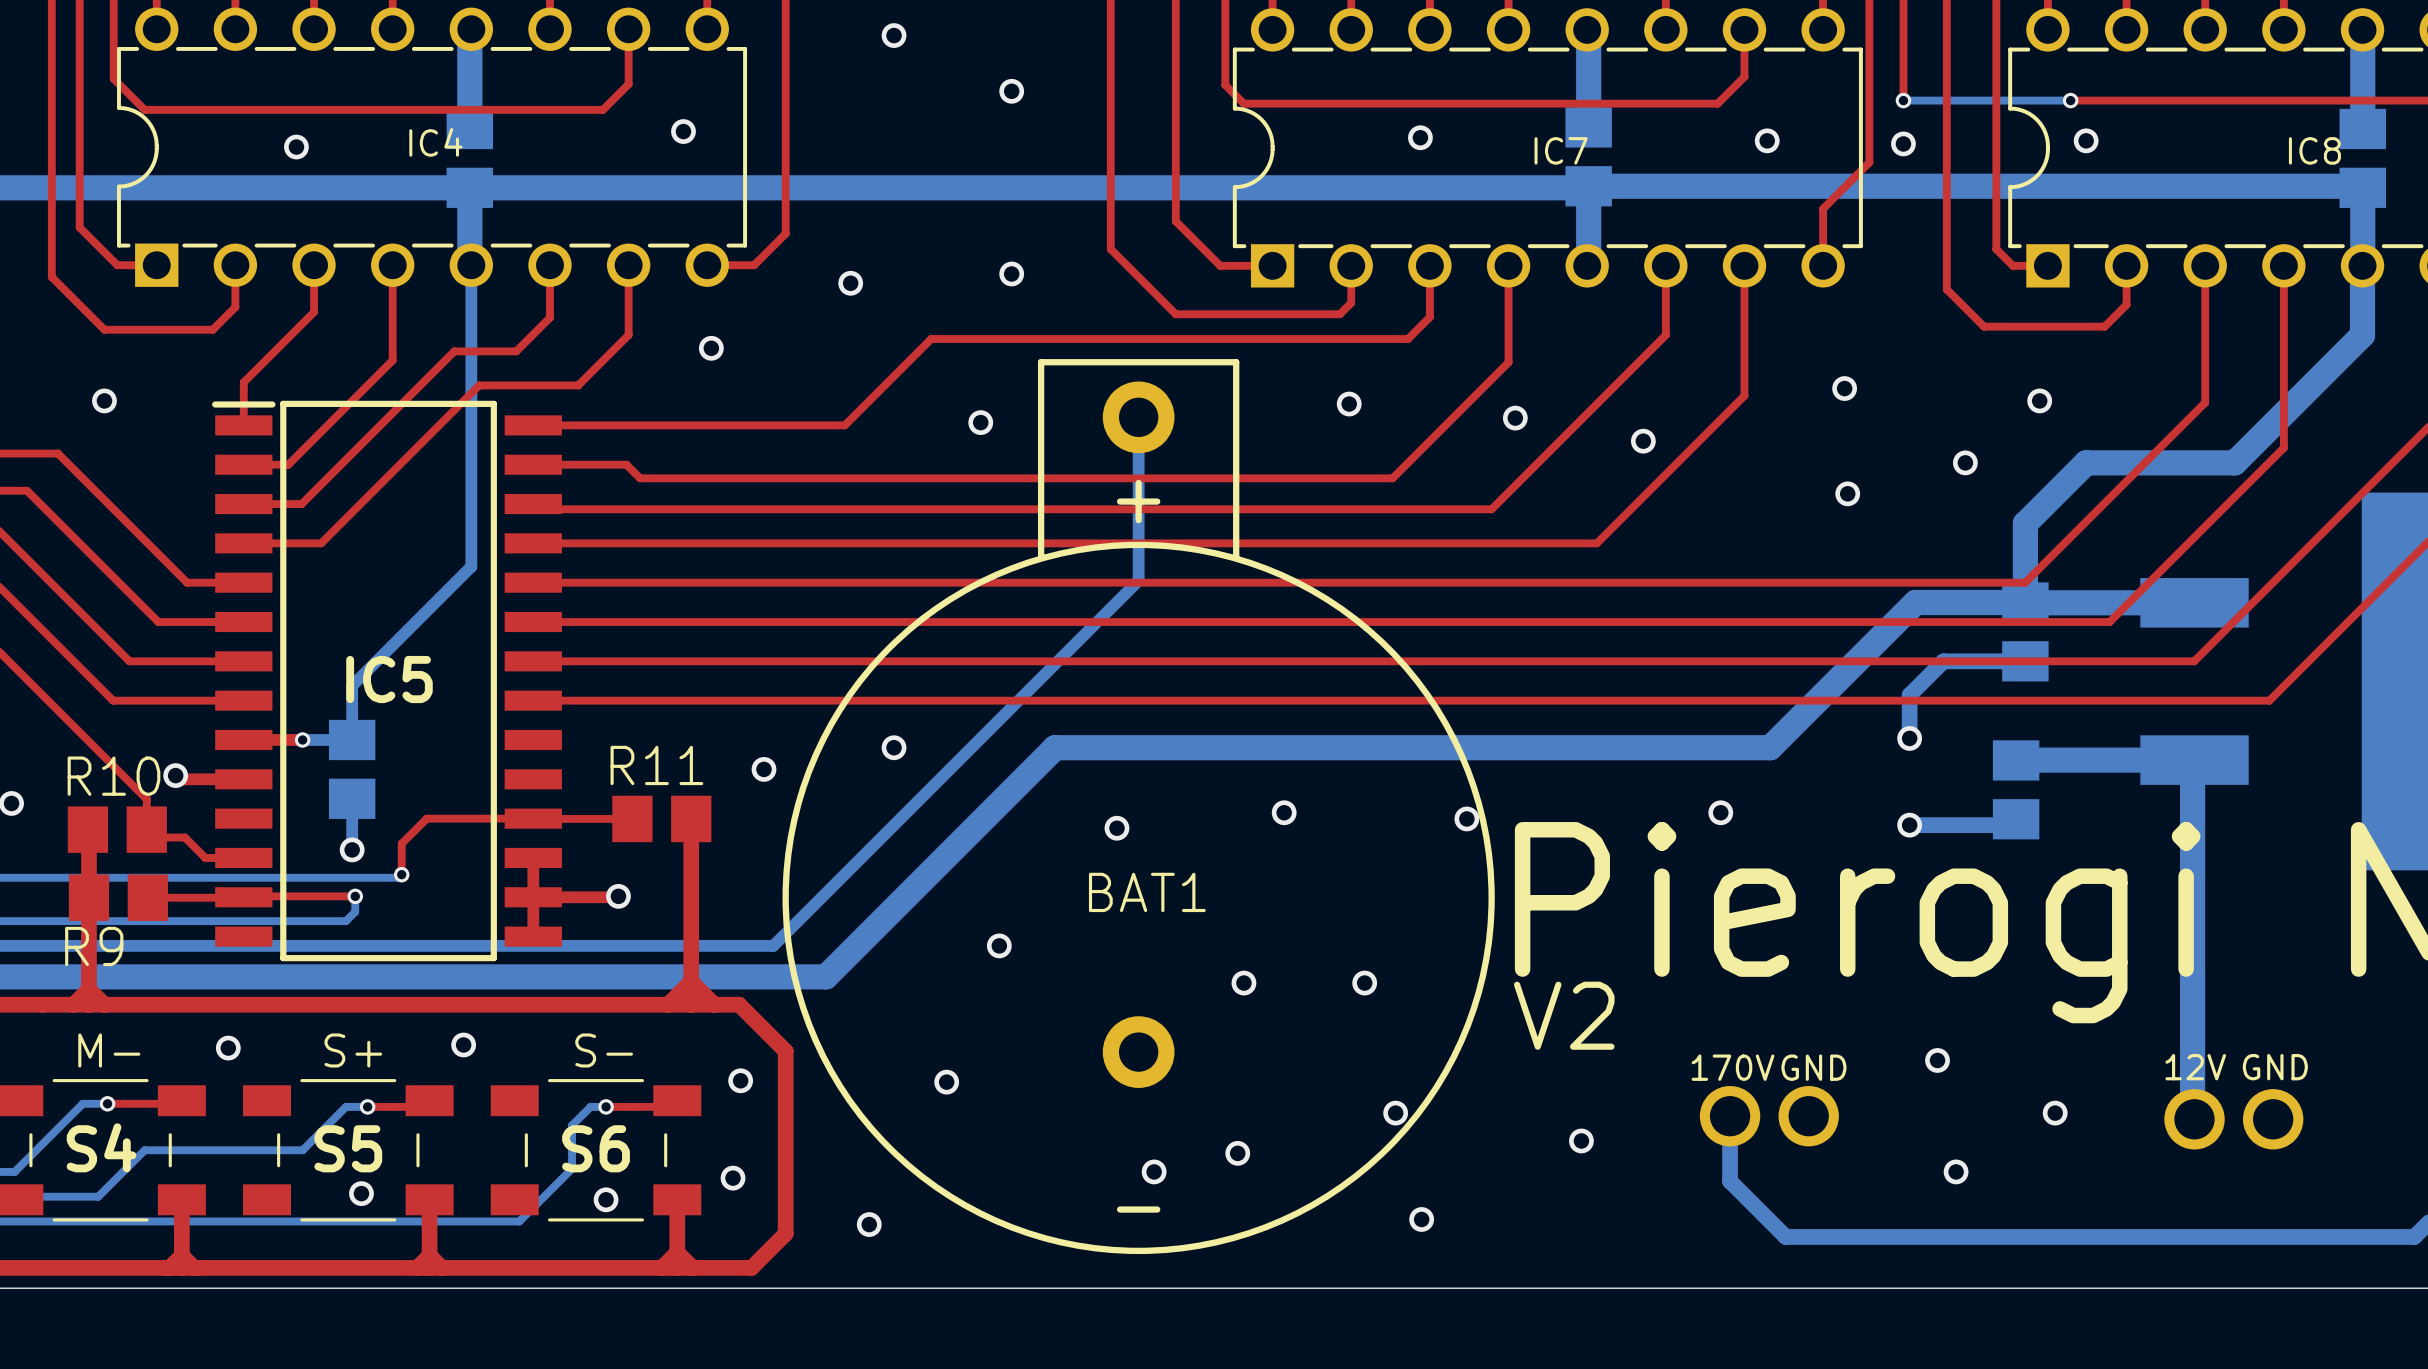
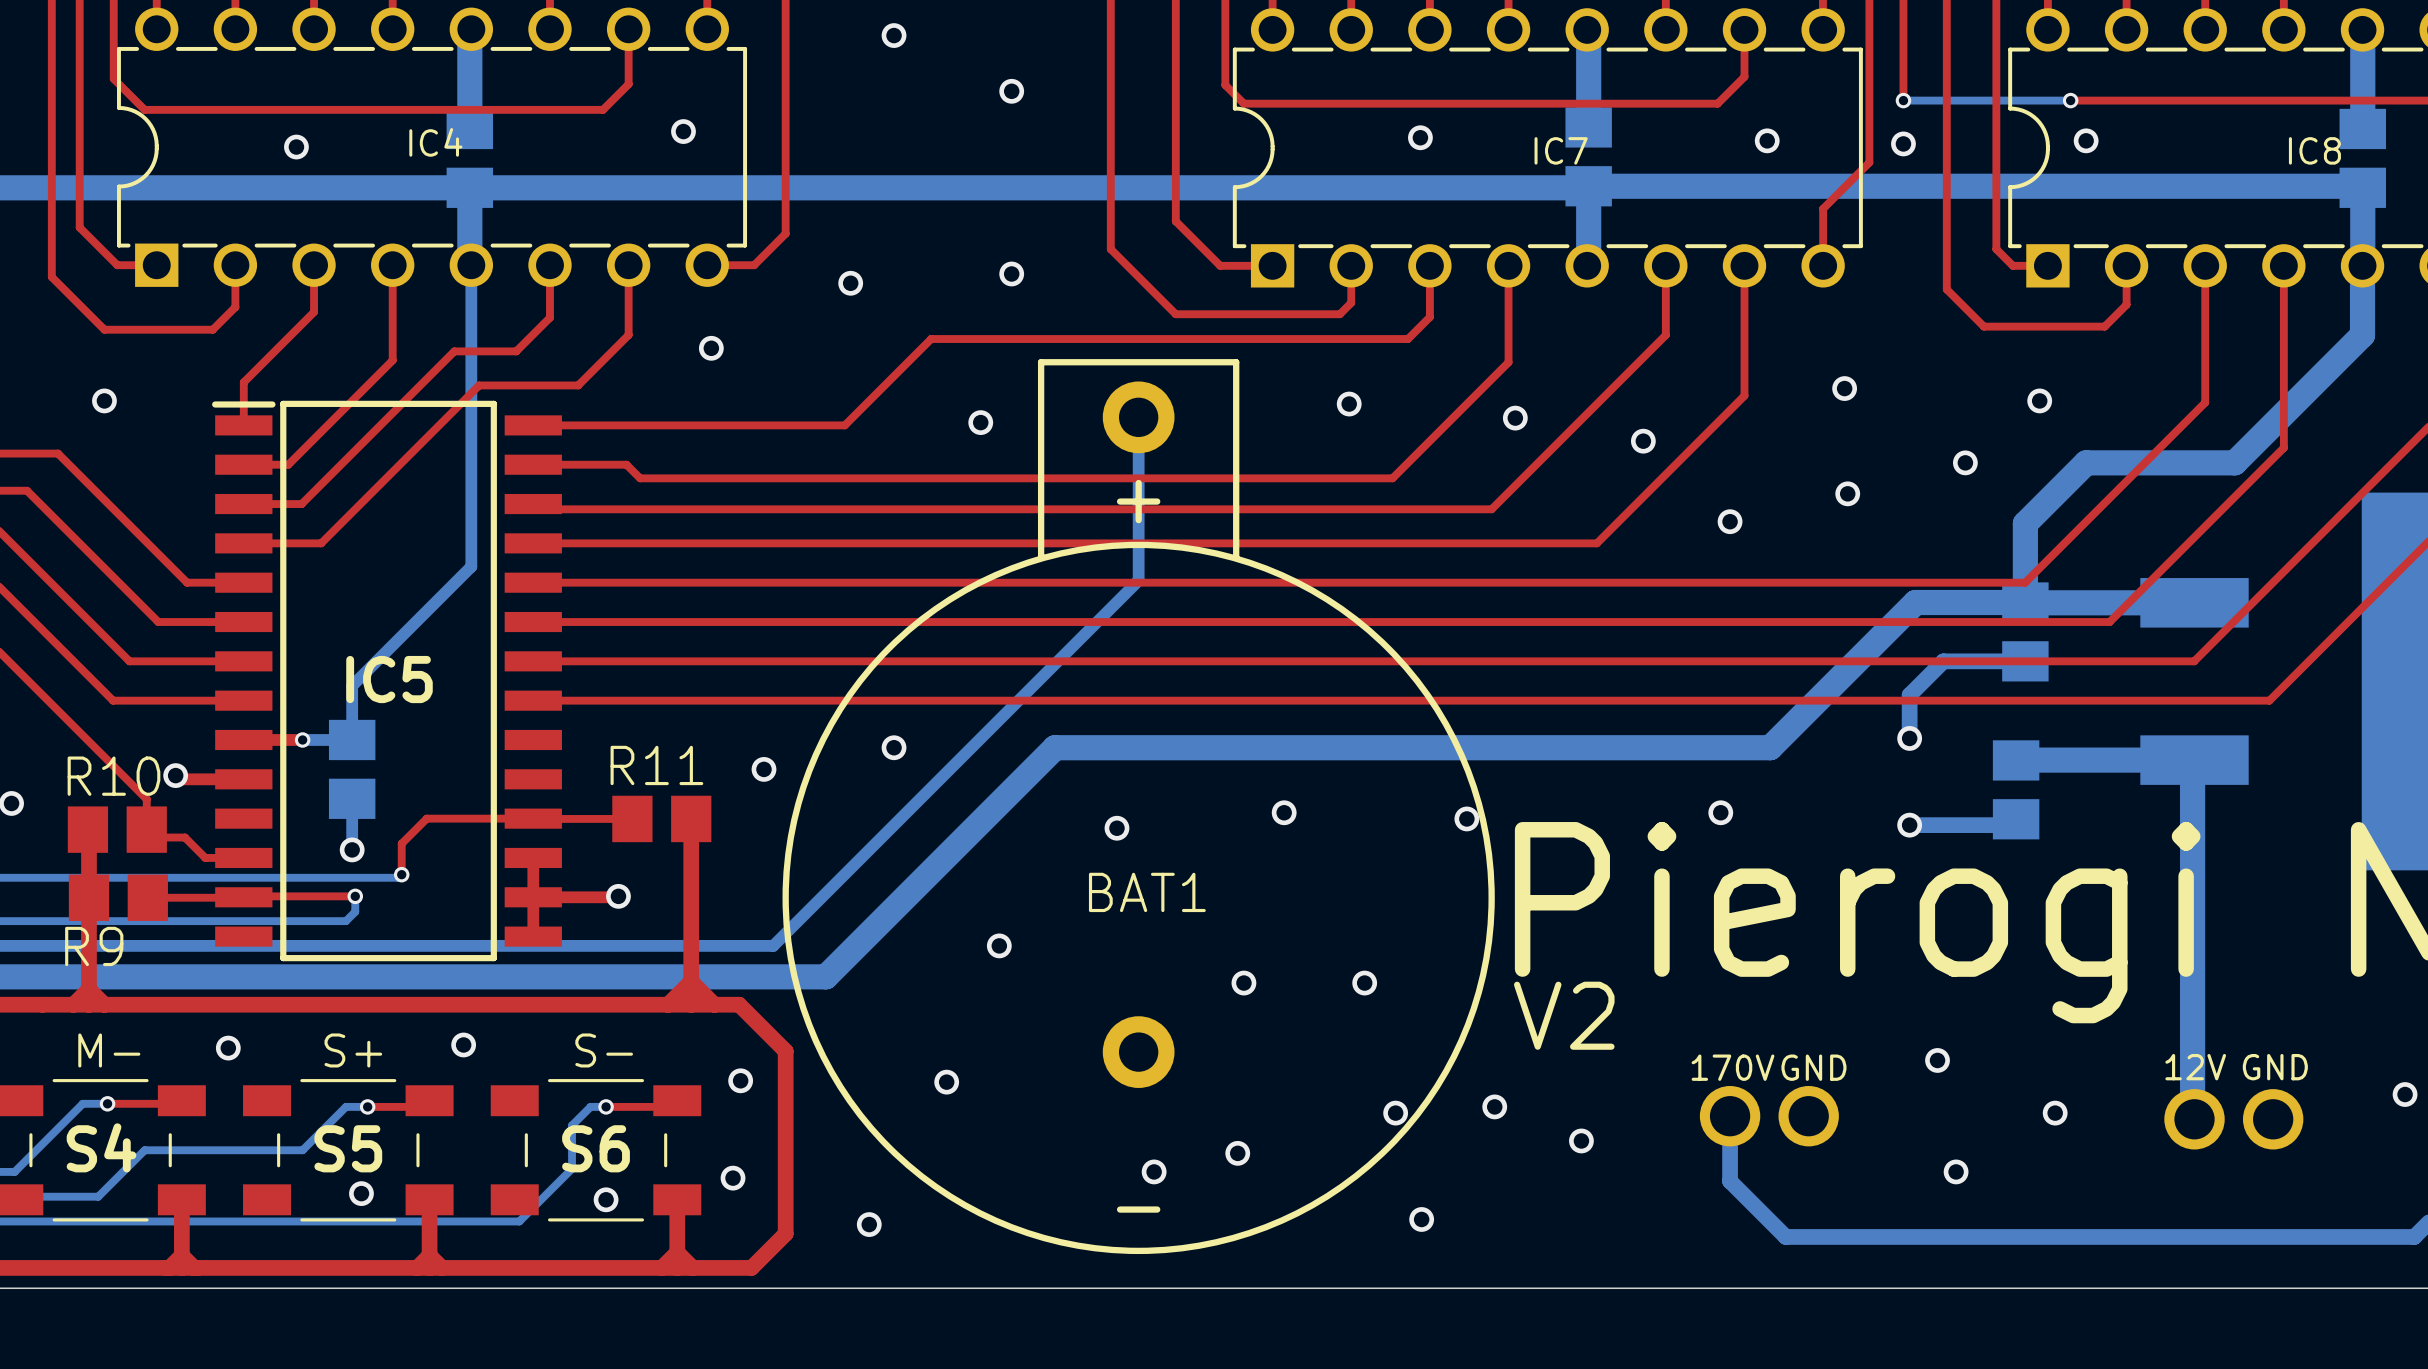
via: none -> (1730, 521)
via: none -> (2405, 1094)
via: none -> (1494, 1106)

